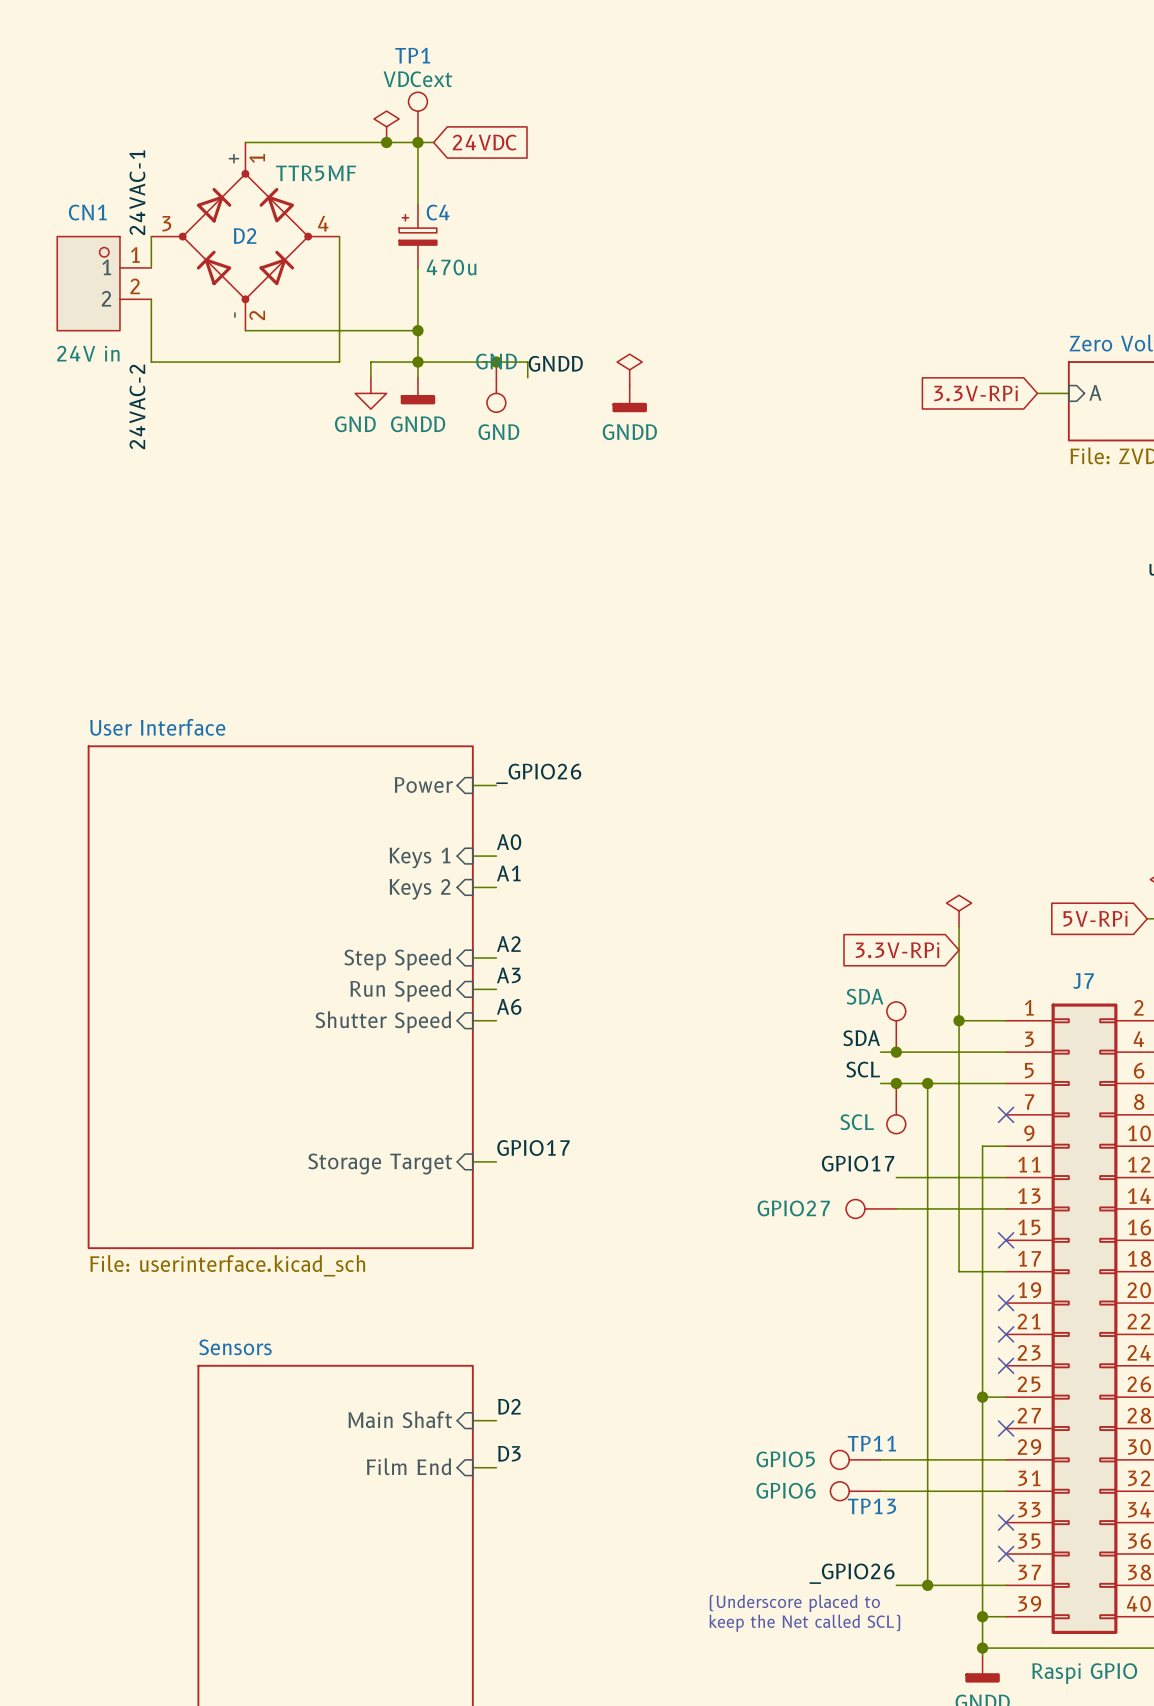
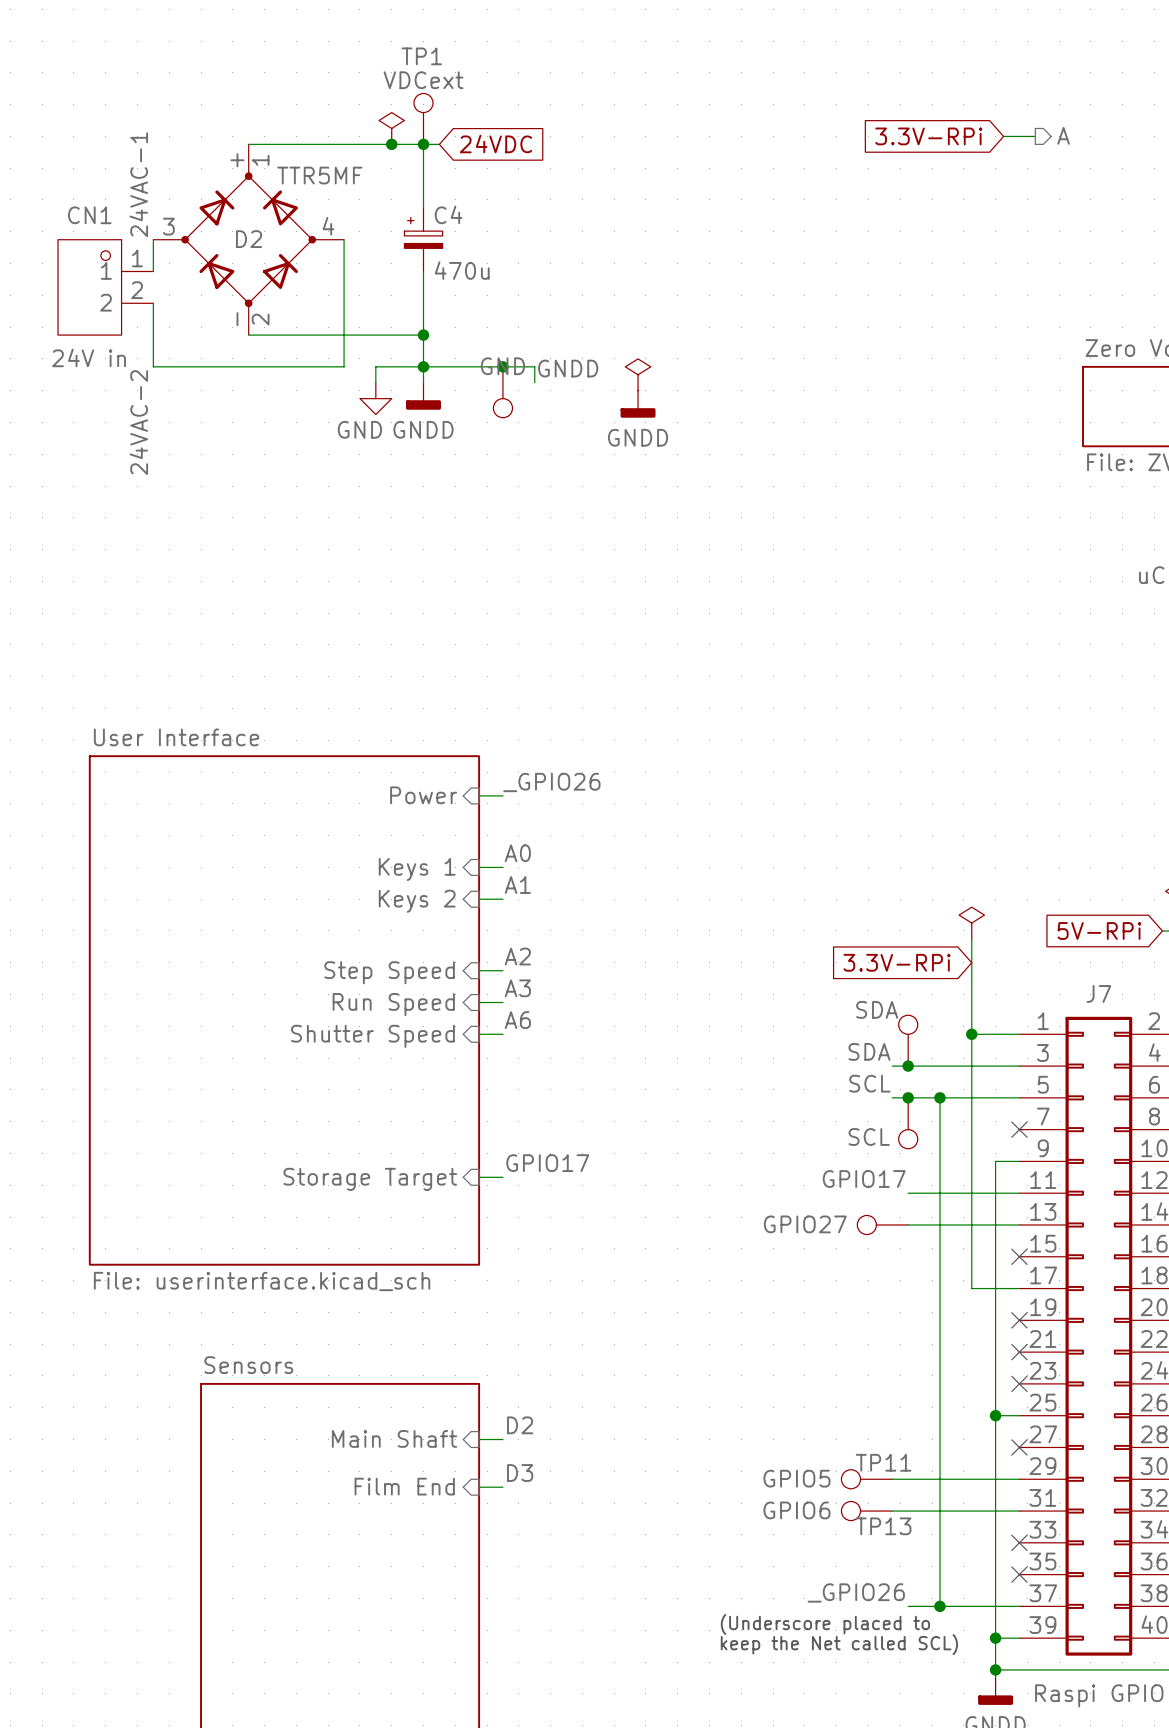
sheet pin position: A (1095, 392) -> A (1063, 135)
global label position: 3.3V-RPi (975, 393) -> 3.3V-RPi (928, 136)
wire: (1037, 393) (1068, 393) -> (1003, 136) (1035, 136)
part value: GND (498, 432) -> none

